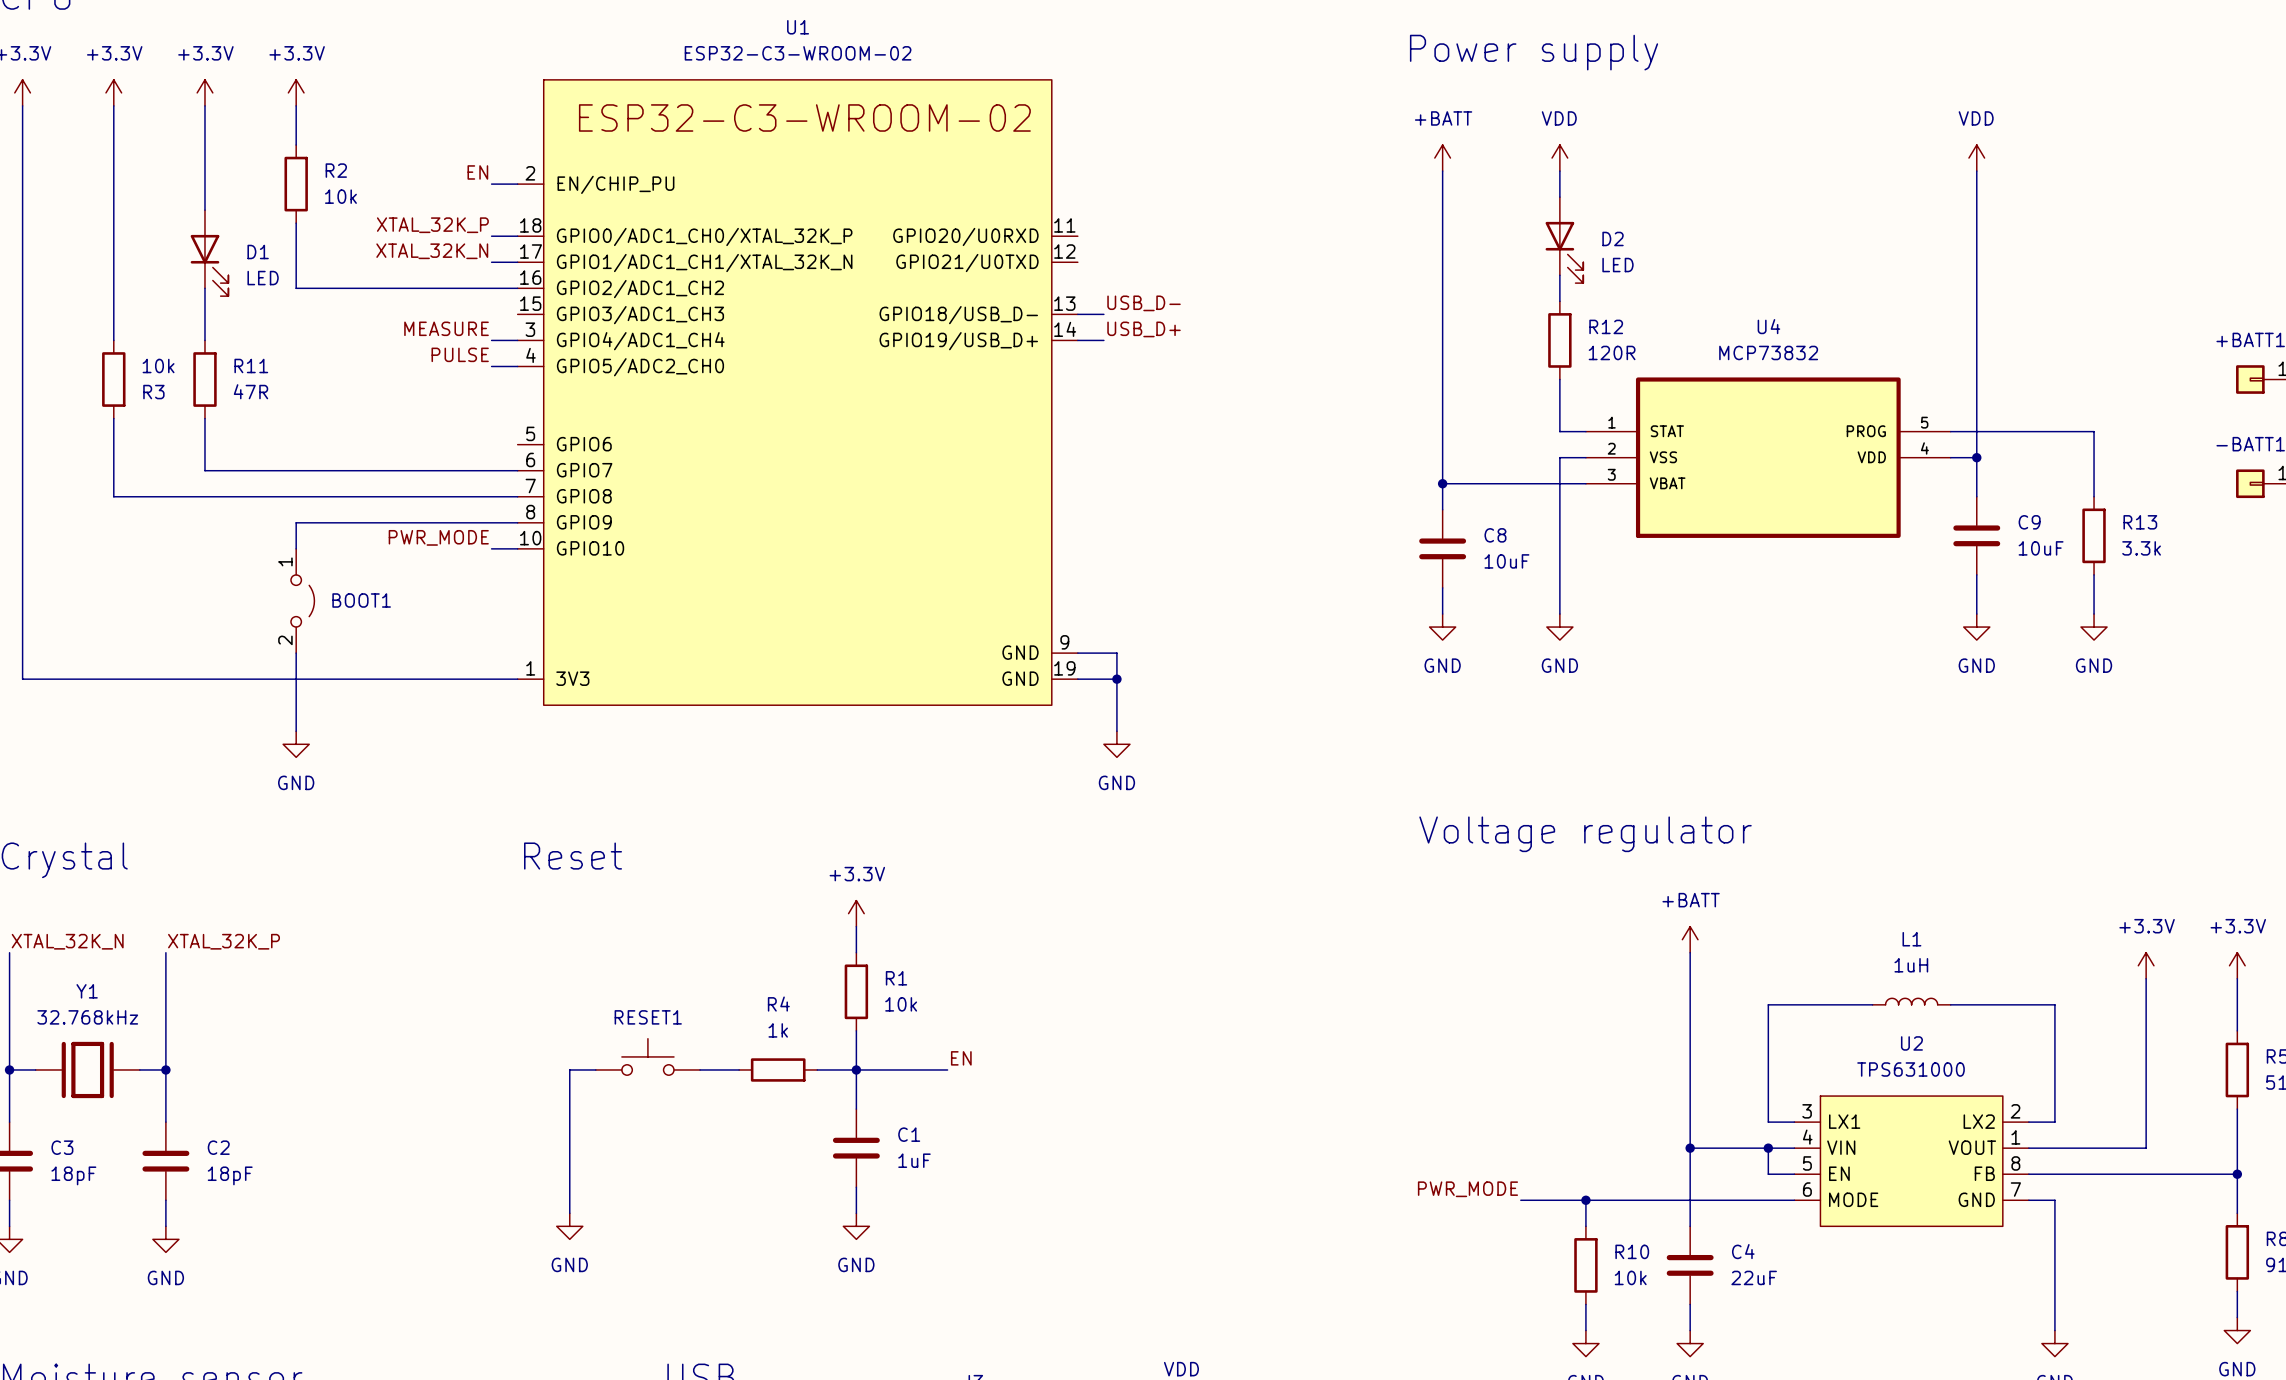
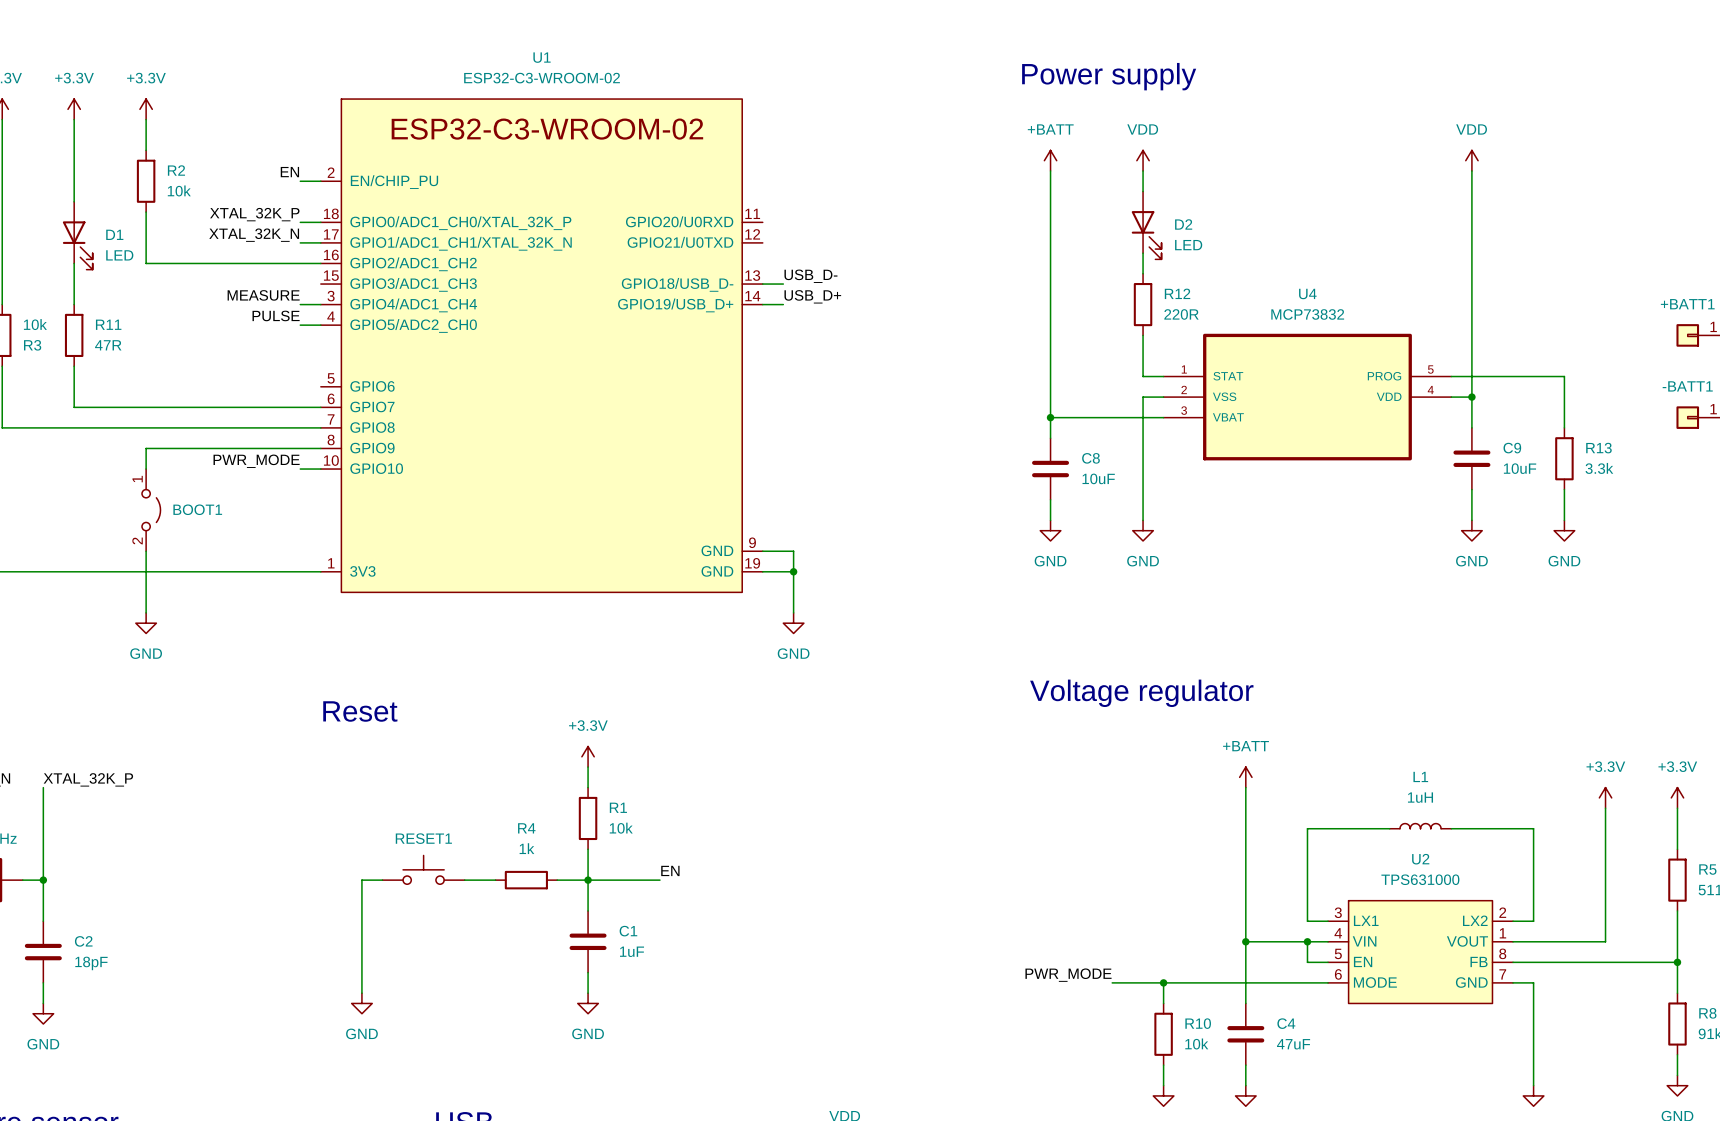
R12 value: 120R (1612, 352) -> 220R (1181, 314)
C4 value: 22uF (1754, 1277) -> 47uF (1293, 1044)

